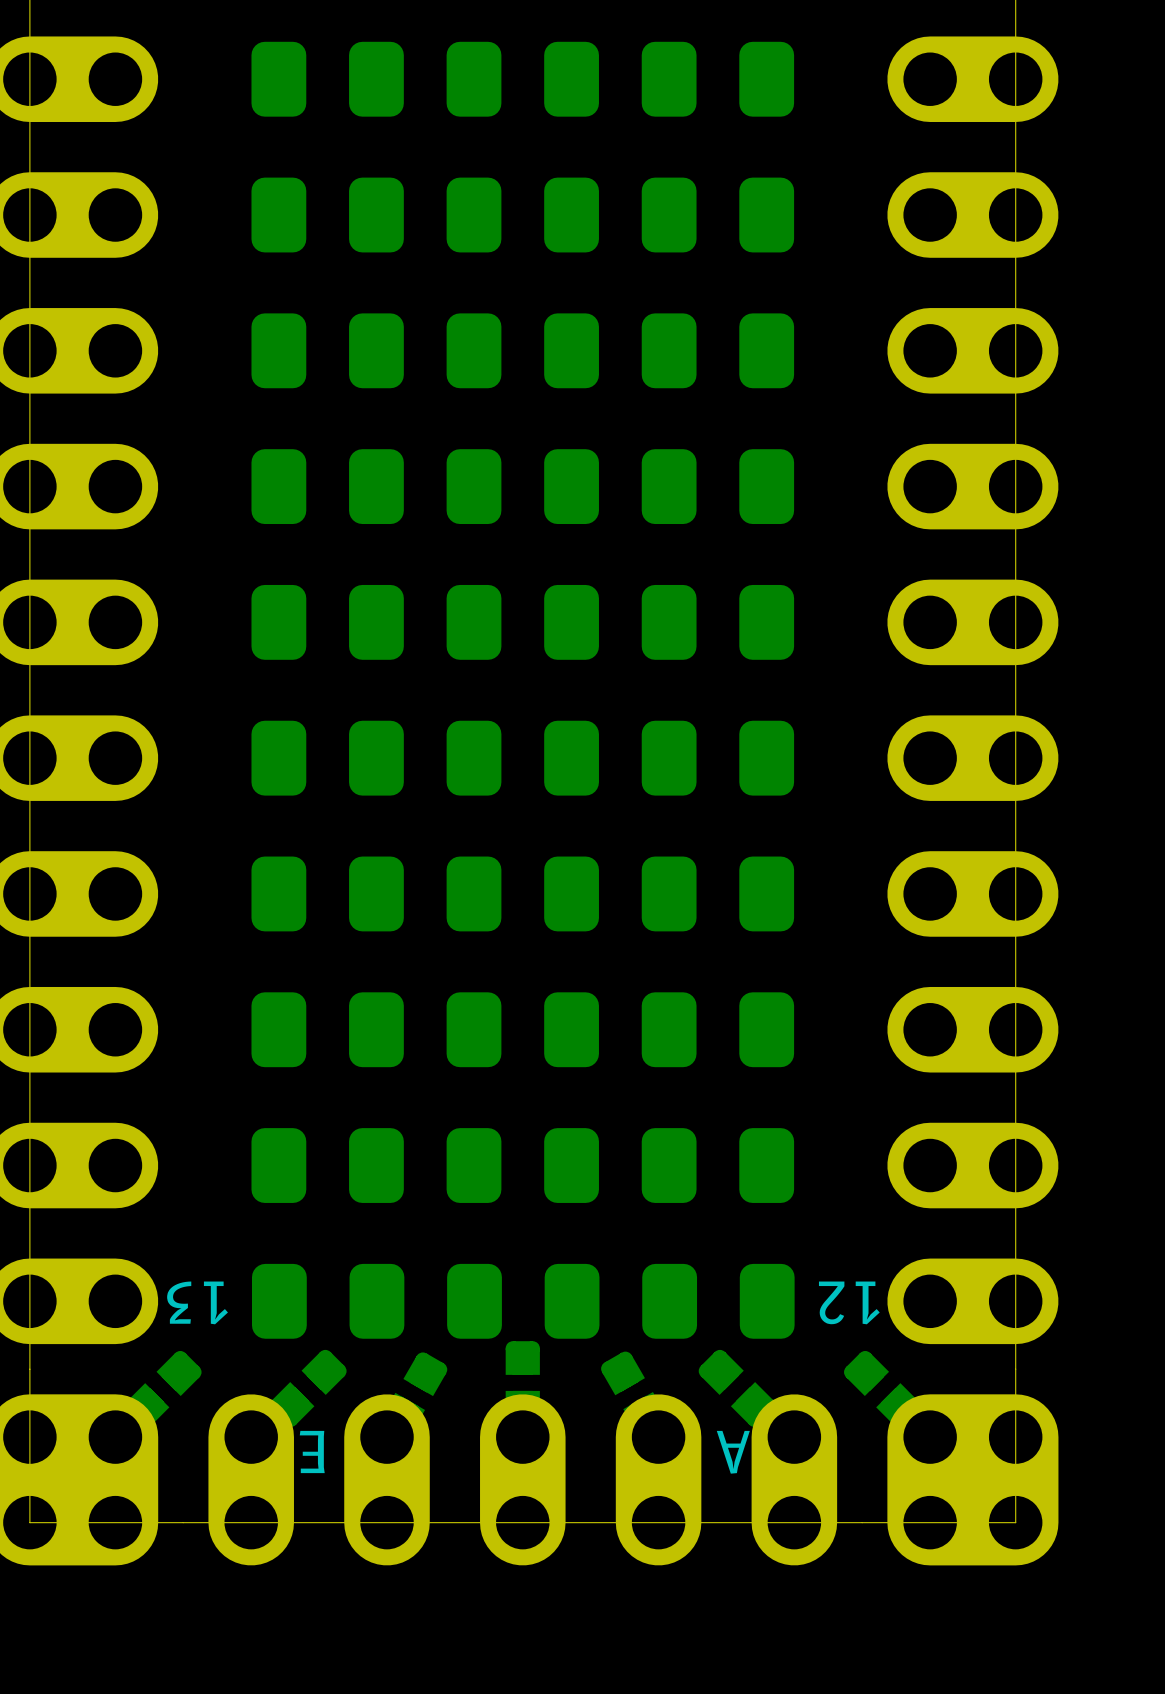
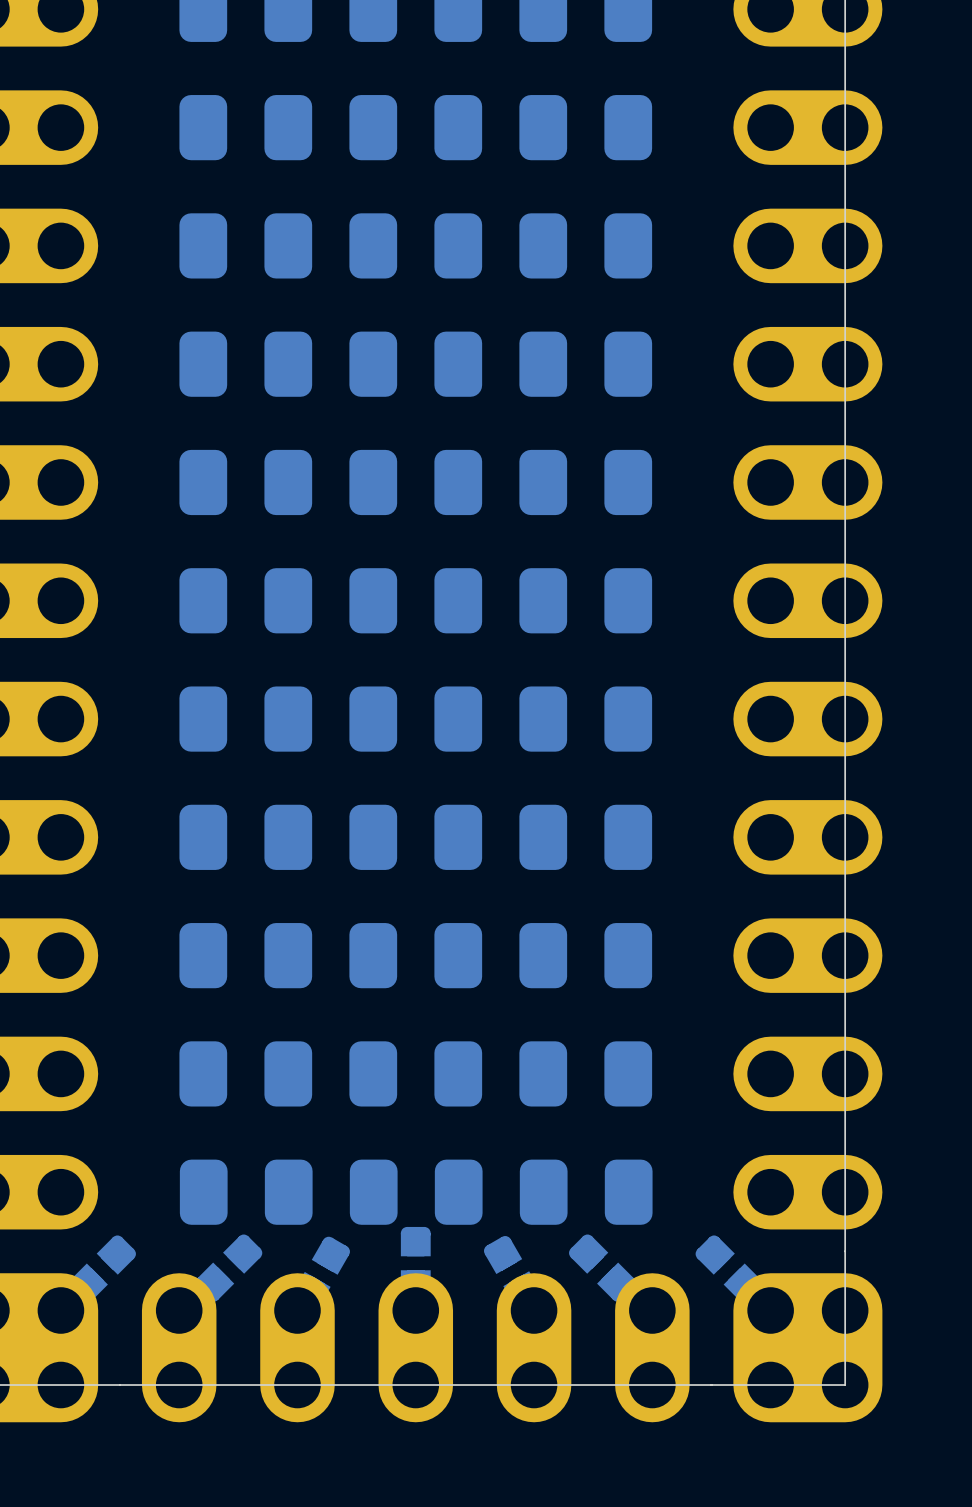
text: 13 (197, 1302) -> none
text: 12 (849, 1302) -> none
text: E (312, 1452) -> none
text: A (733, 1452) -> none

